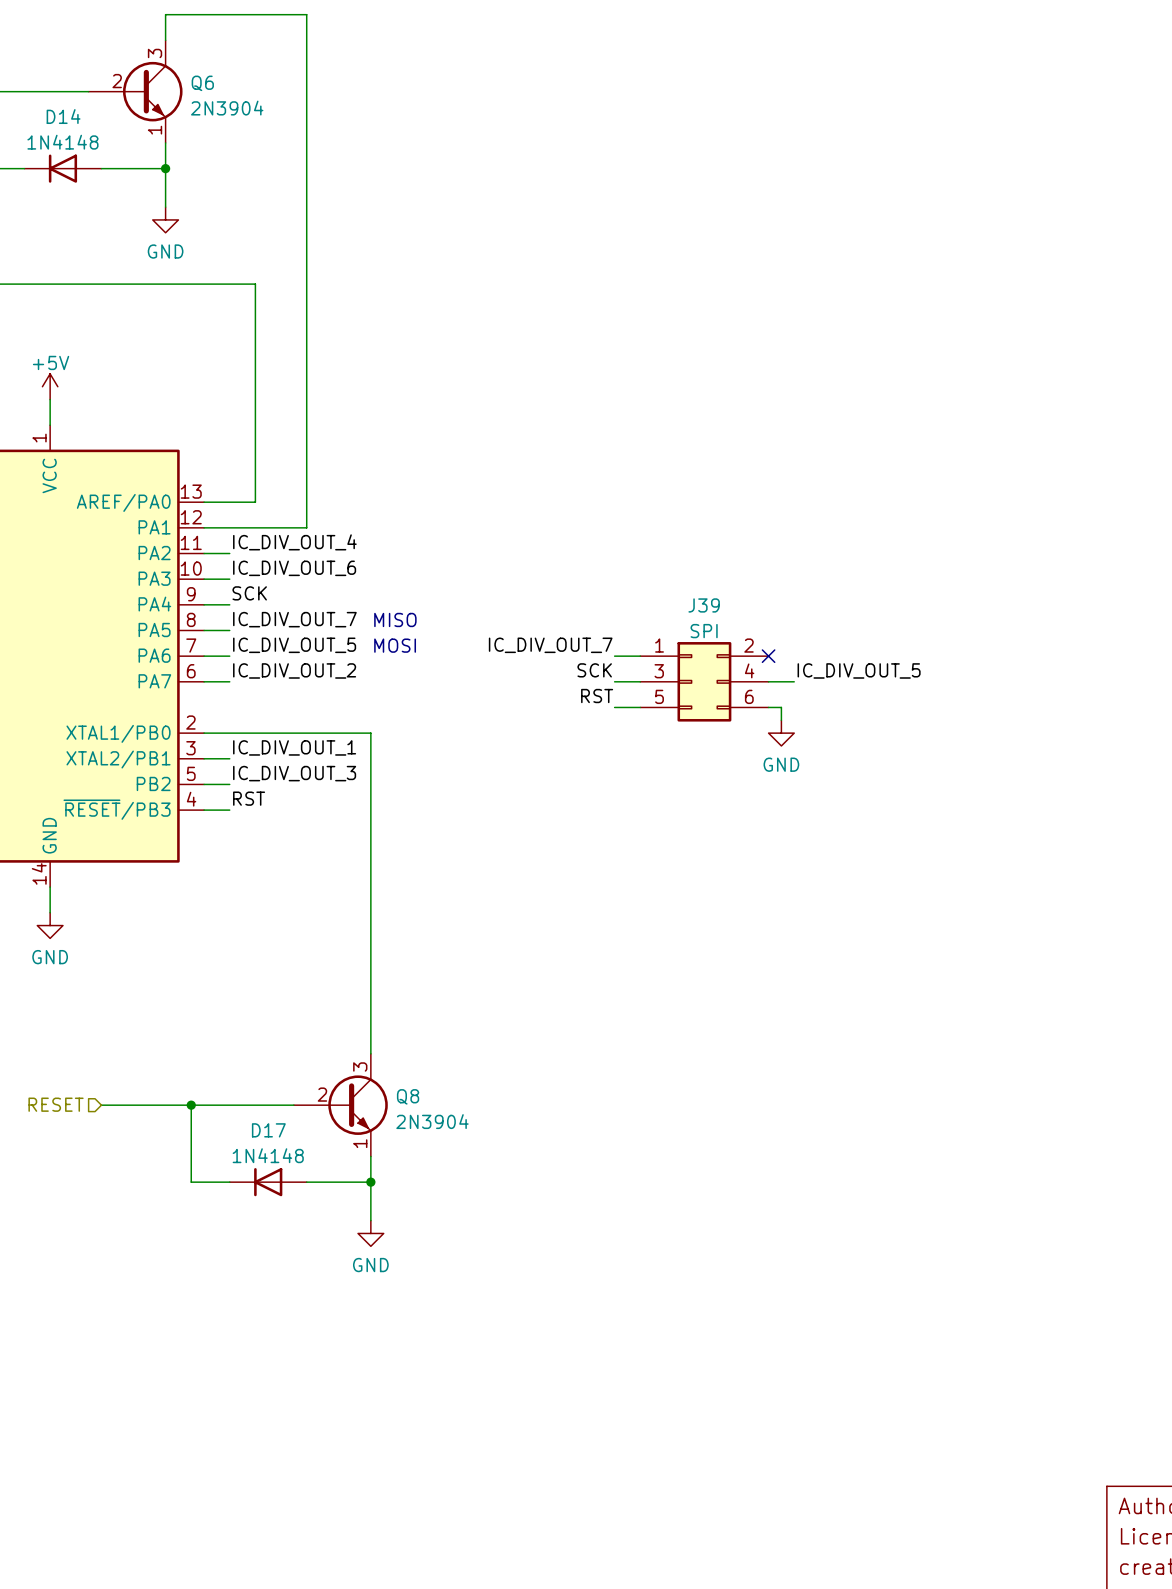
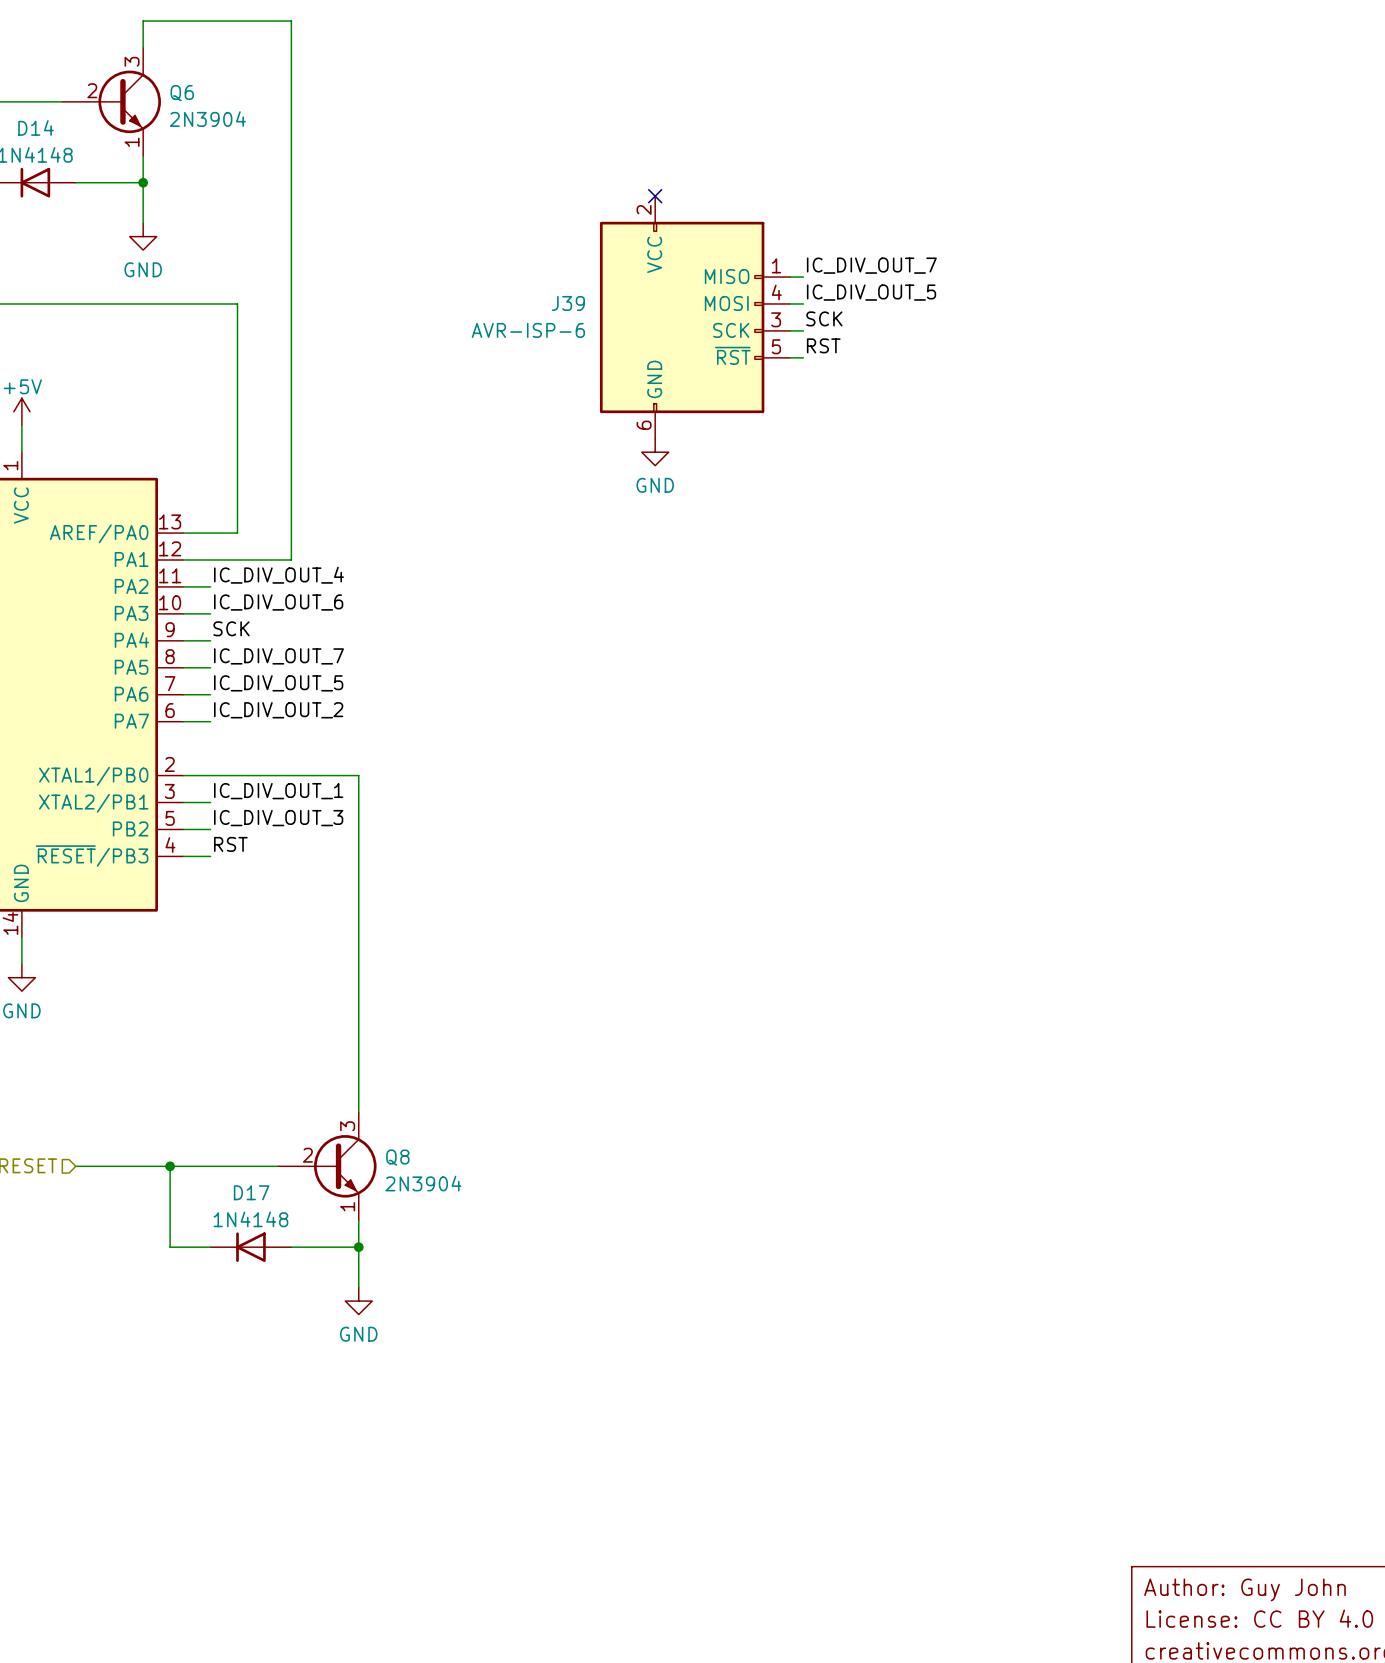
no-connect mark: none -> (655, 196)
label: none -> IC_DIV_OUT_7 (871, 265)
wire: none -> (789, 277) (803, 277)
label: none -> IC_DIV_OUT_5 (871, 292)
wire: none -> (789, 303) (803, 303)
label: none -> SCK (824, 318)
wire: none -> (789, 330) (803, 330)
label: none -> RST (823, 345)
wire: none -> (789, 357) (803, 357)
power symbol: none -> GND (655, 452)
J39 name position: J39 (704, 605) -> J39 (568, 303)
text: MISO (395, 619) -> none
J39 value: SPI (704, 631) -> AVR-ISP-6 (528, 330)
J39 symbol: [640, 642, 769, 722] -> [599, 196, 790, 439]
text: MOSI (395, 645) -> none
label: IC_DIV_OUT_7 (550, 645) -> none
wire: (614, 656) (640, 656) -> none
no-connect mark: (768, 656) -> none
label: SCK (594, 670) -> none
label: IC_DIV_OUT_5 (859, 670) -> none
wire: (614, 681) (640, 681) -> none
wire: (768, 681) (794, 681) -> none
label: RST (597, 696) -> none
wire: (614, 707) (640, 707) -> none
wire: (768, 707) (781, 707) (781, 720) -> none
power symbol: GND (781, 733) -> none

